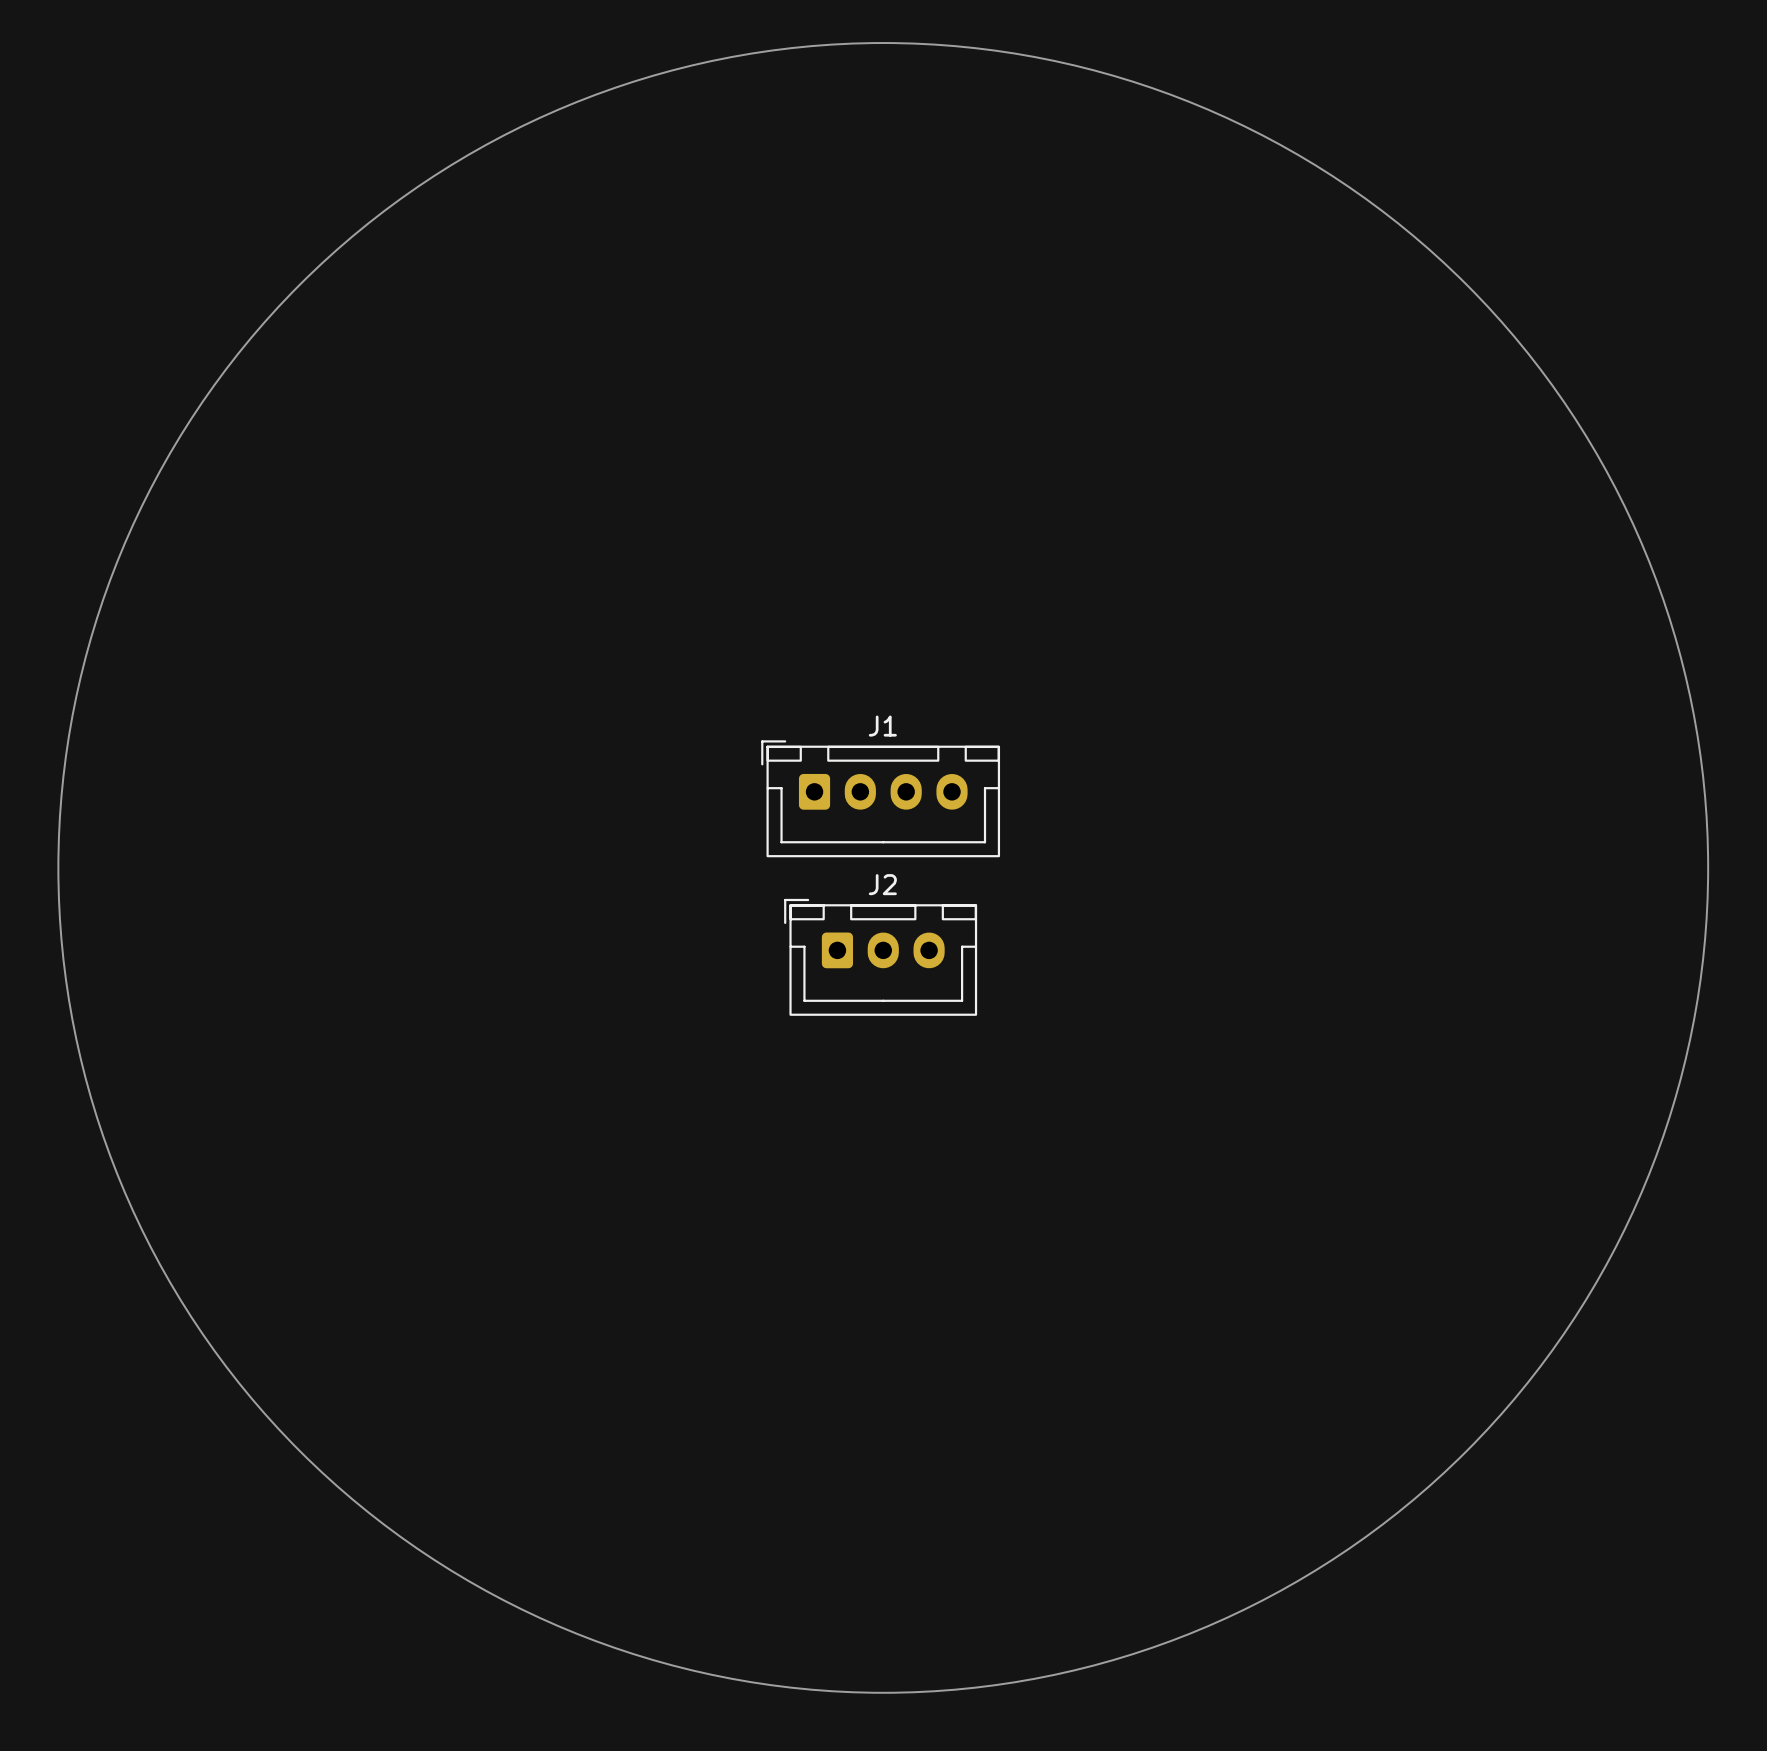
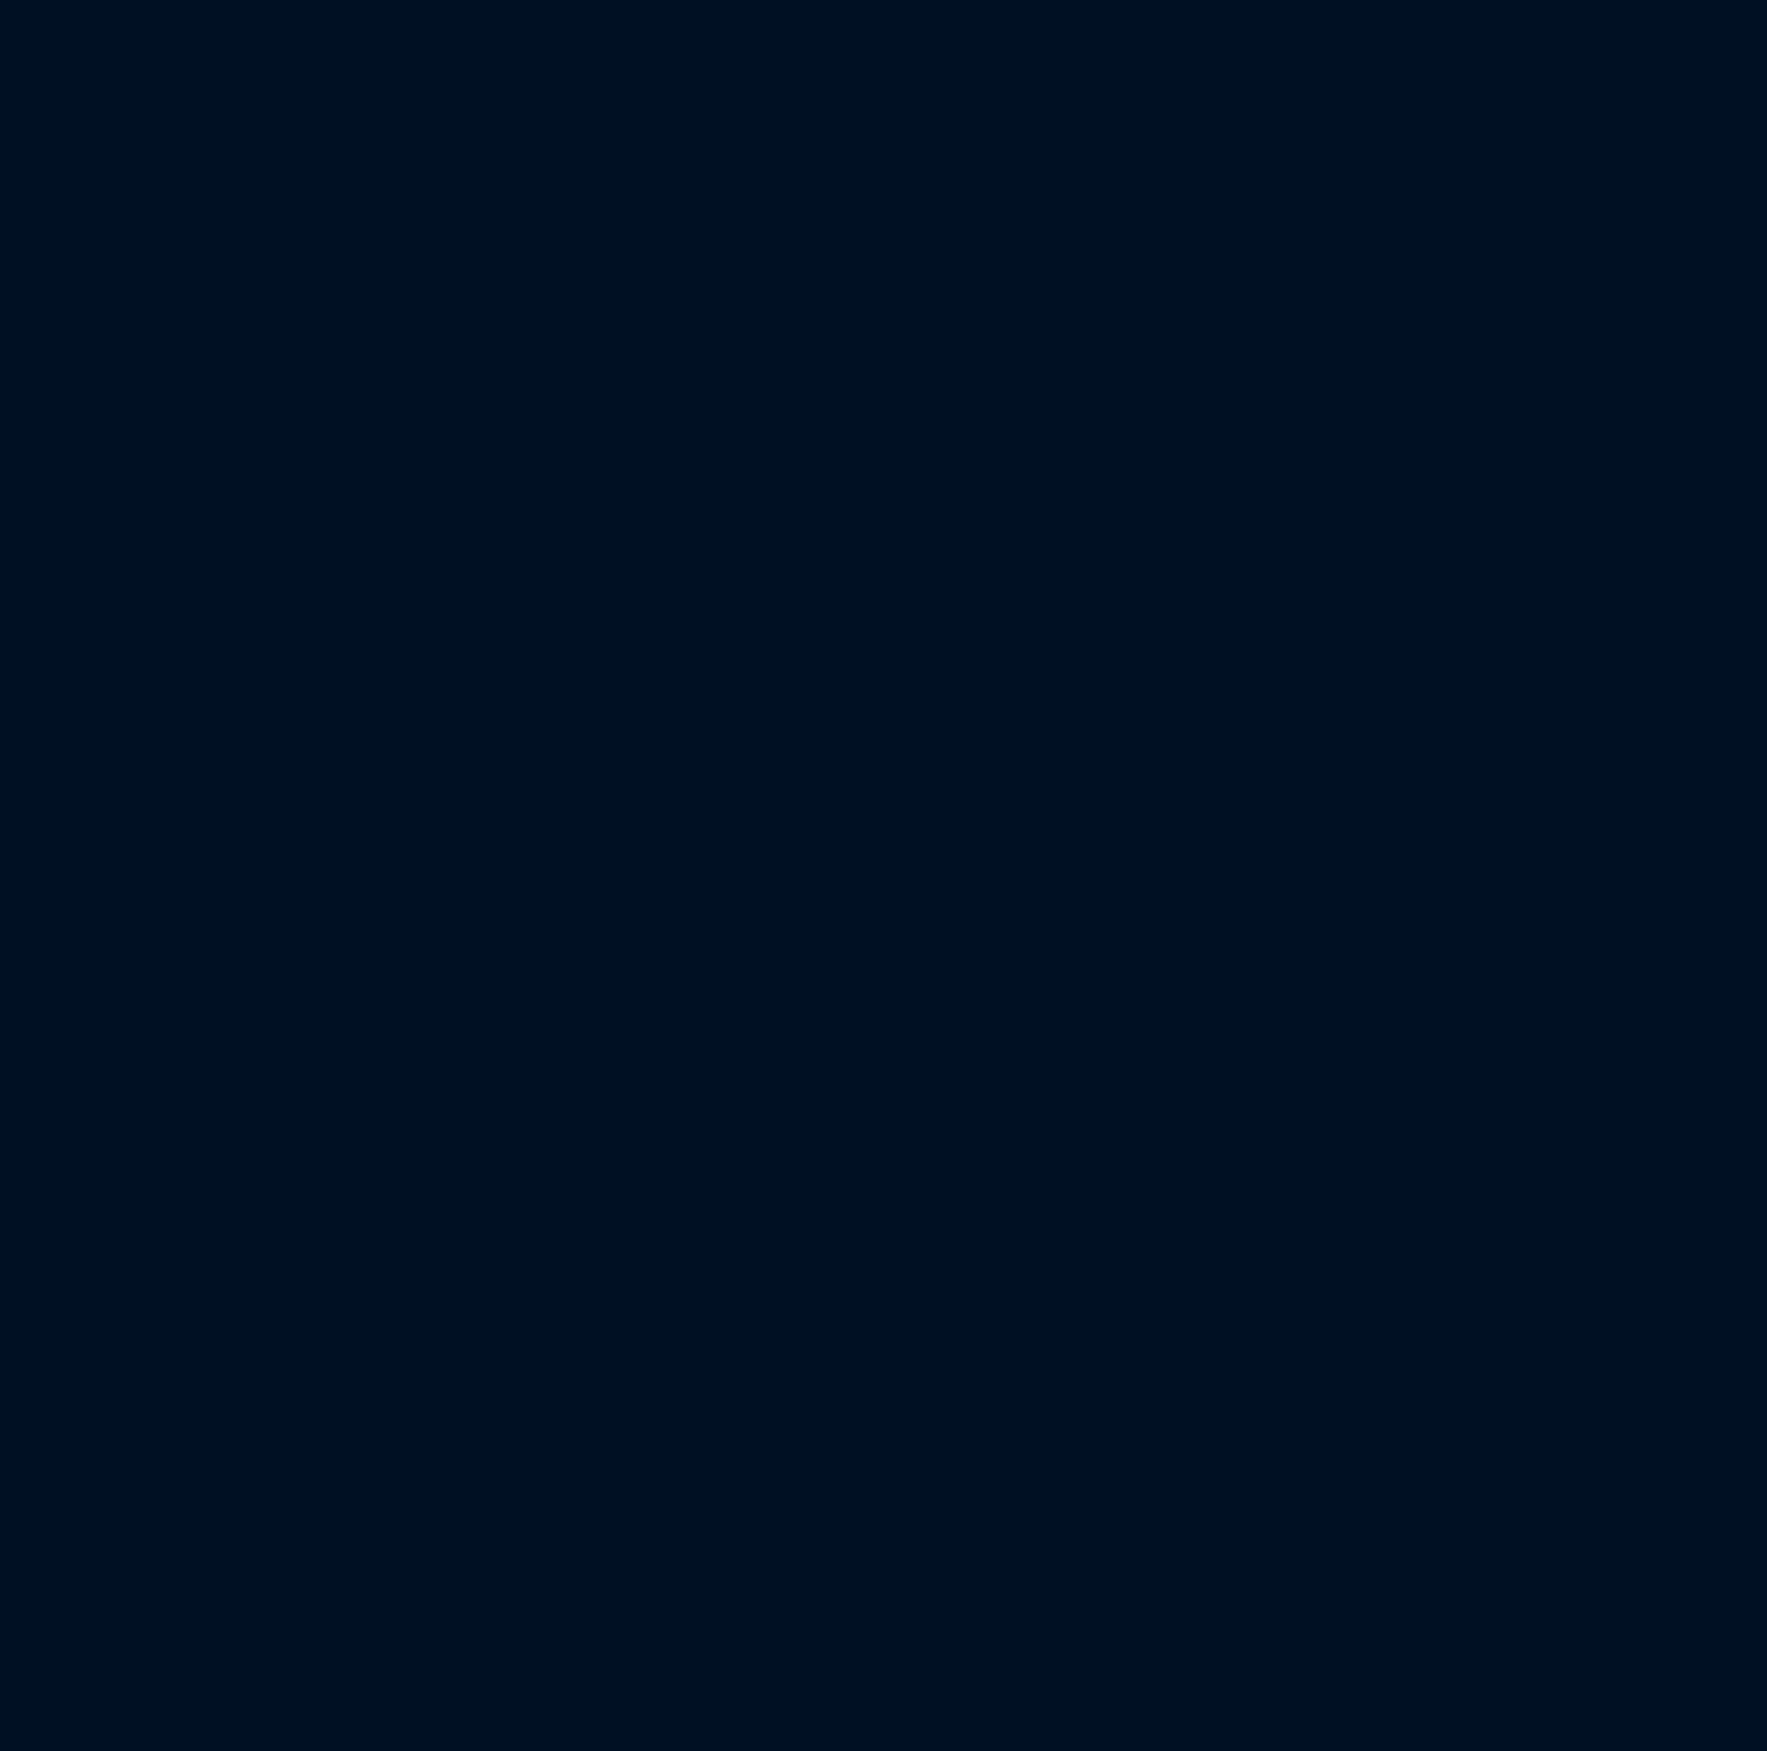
round board edge: [57, 42, 1709, 1694] -> none
J1: (880, 798) -> none
J2: (880, 957) -> none

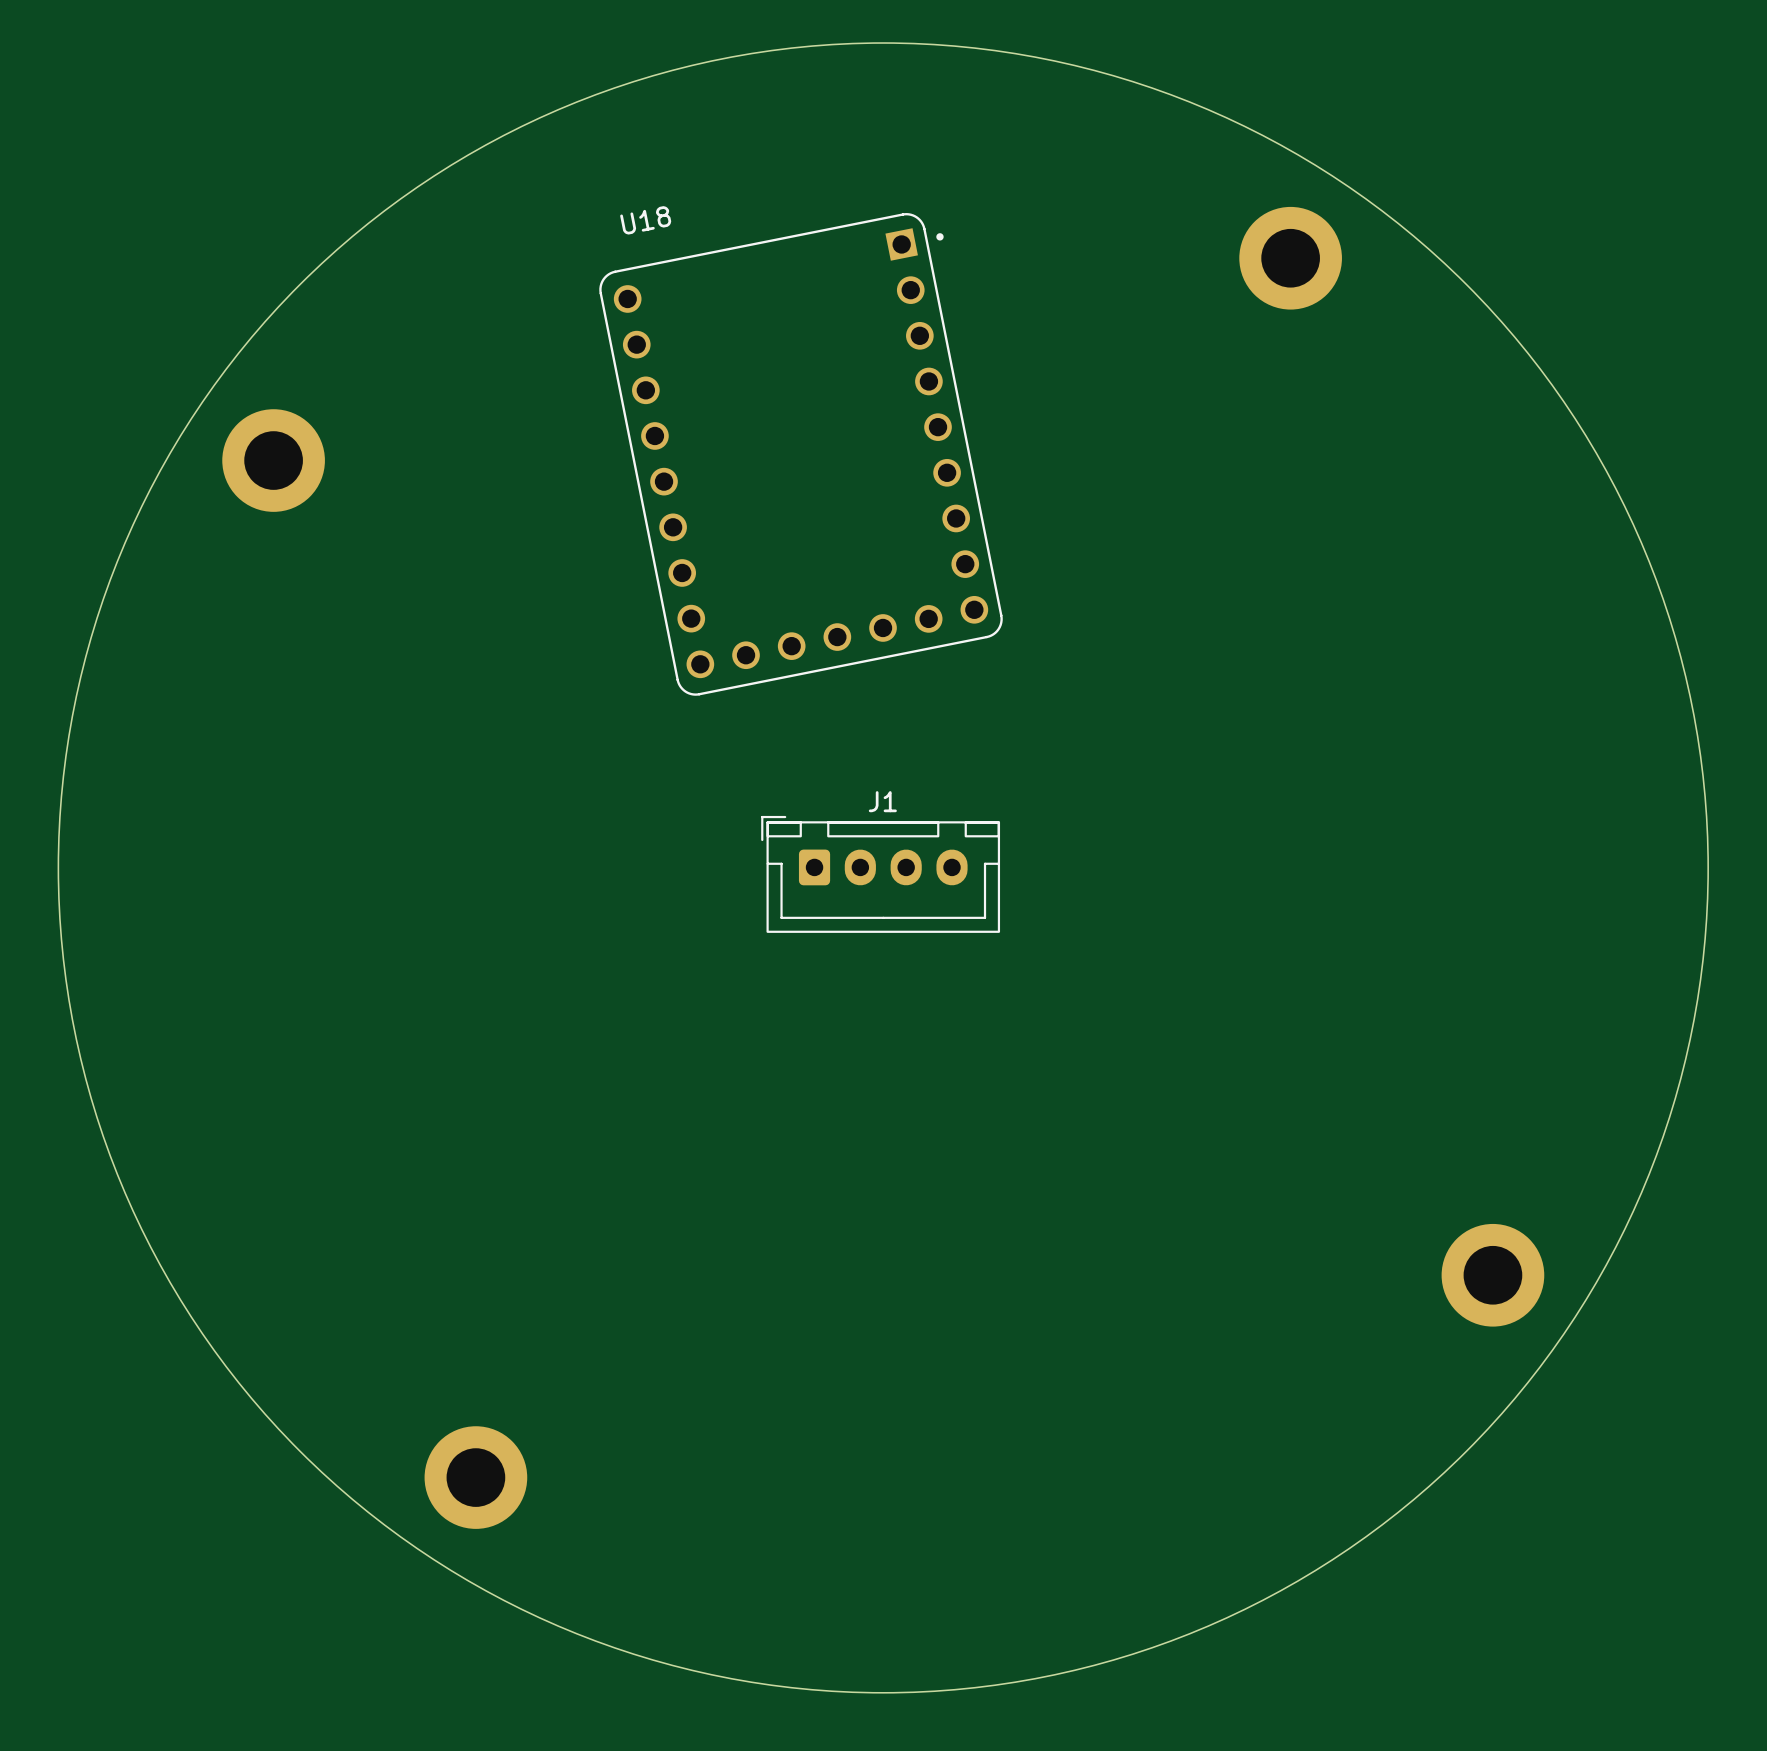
round board edge: none -> [57, 42, 1709, 1694]
part: none -> (1290, 258)
U18: none -> (801, 454)
part: none -> (273, 460)
J1: none -> (880, 874)
part: none -> (1492, 1275)
part: none -> (475, 1477)

